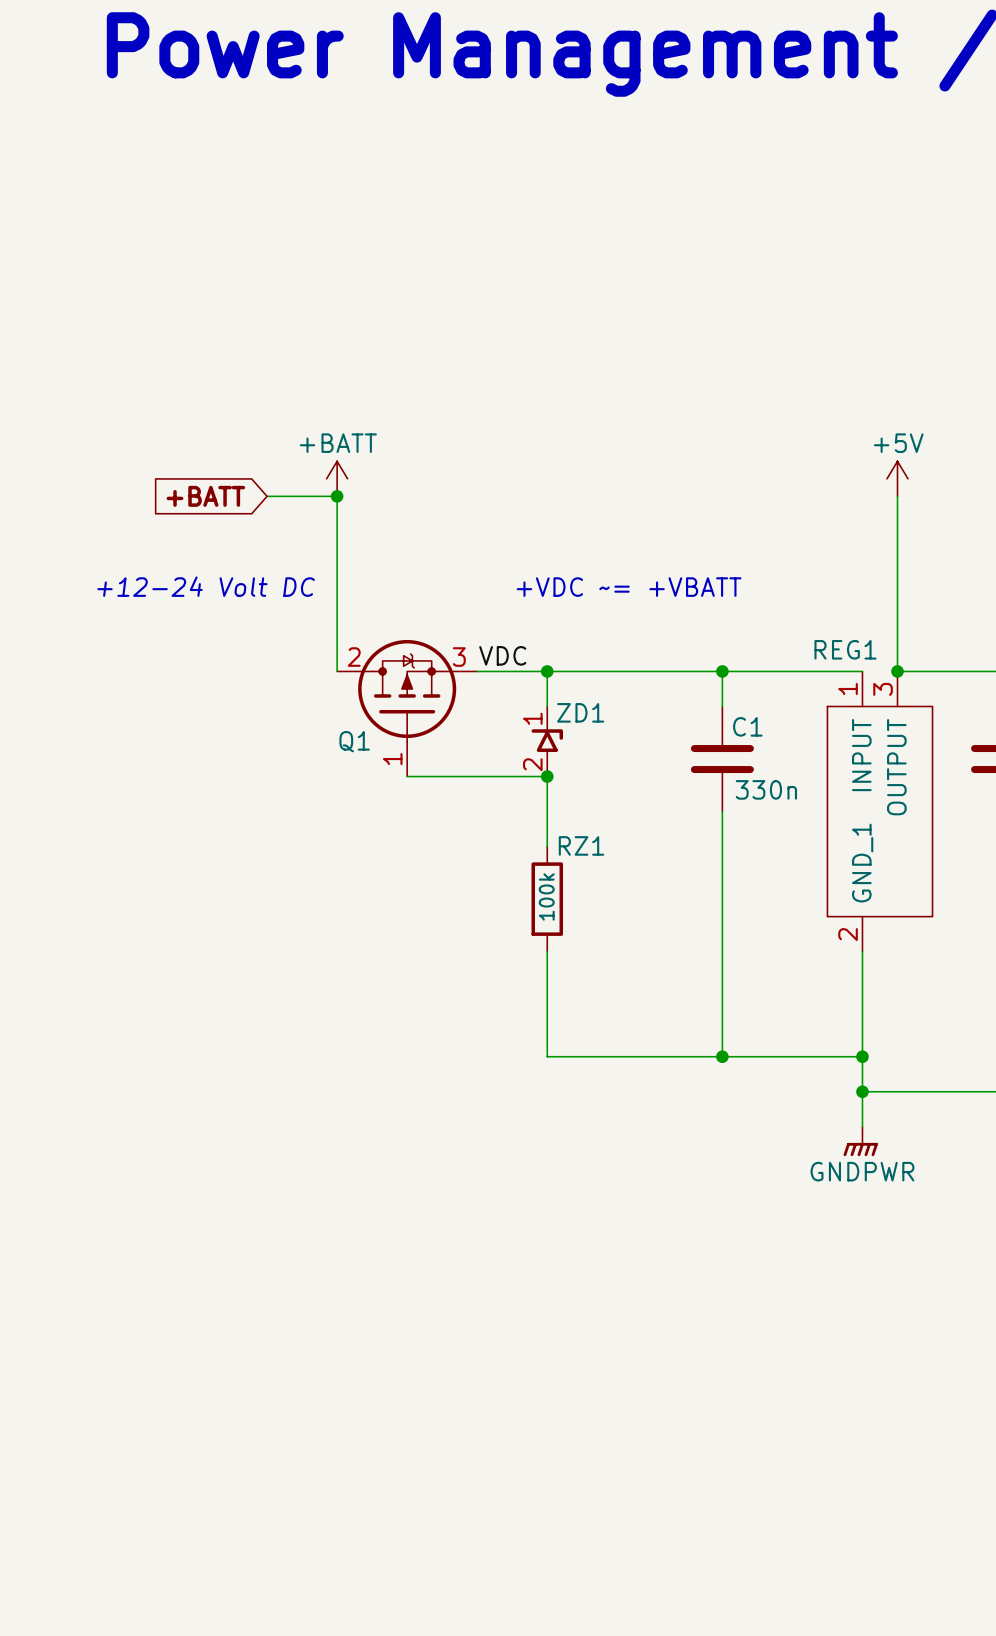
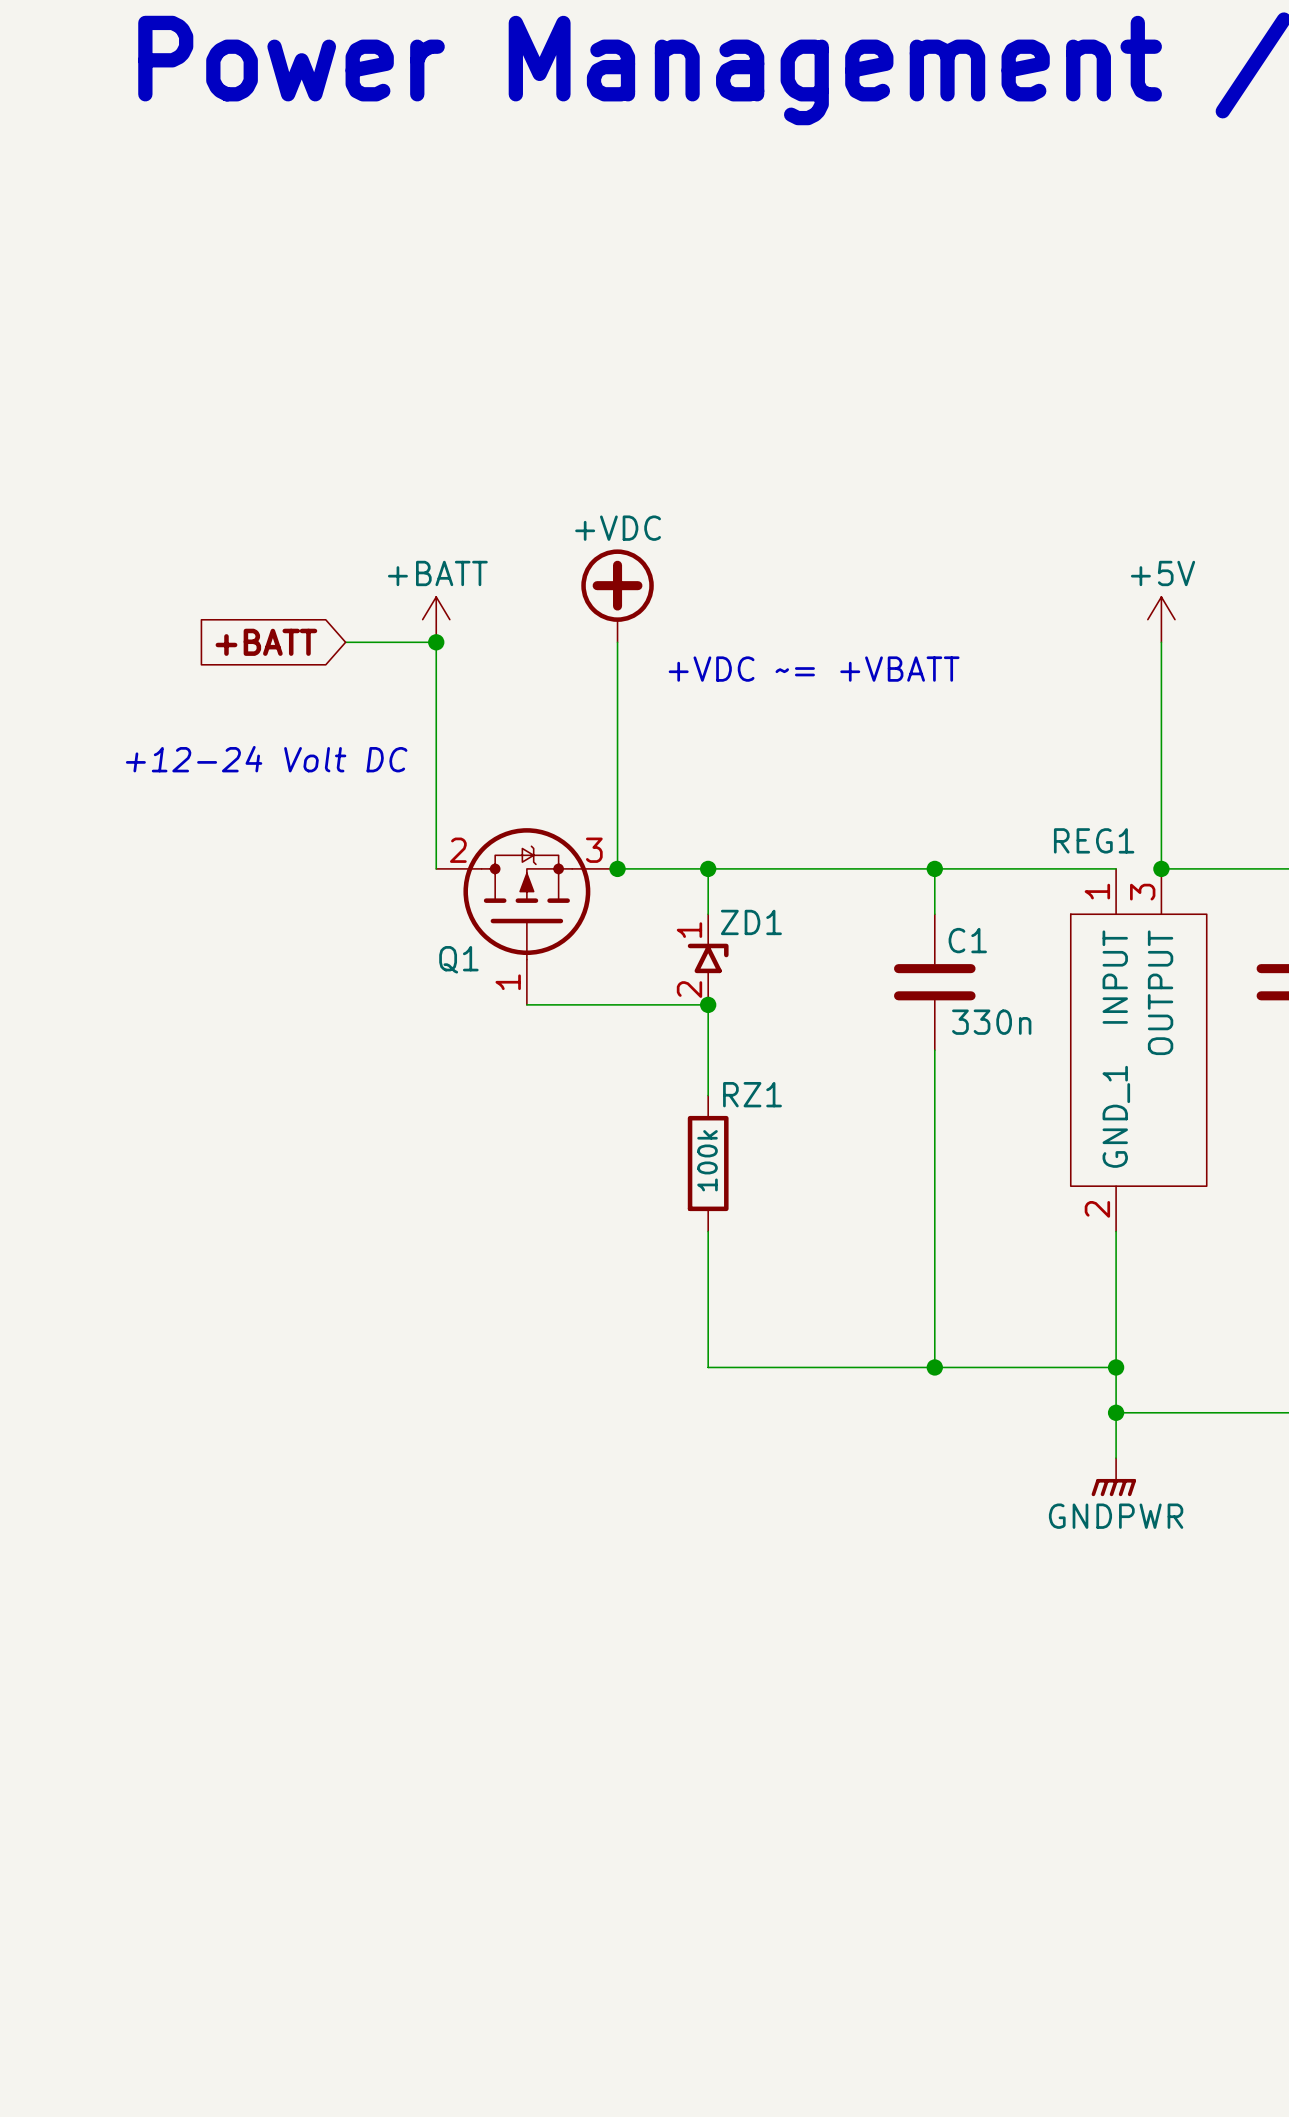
power symbol: none -> +VDC (617, 595)
wire: none -> (617, 642) (617, 868)
text position: +VDC ~= +VBATT (629, 587) -> +VDC ~= +VBATT (814, 669)
label: VDC (502, 655) -> none
junction: none -> (617, 868)

